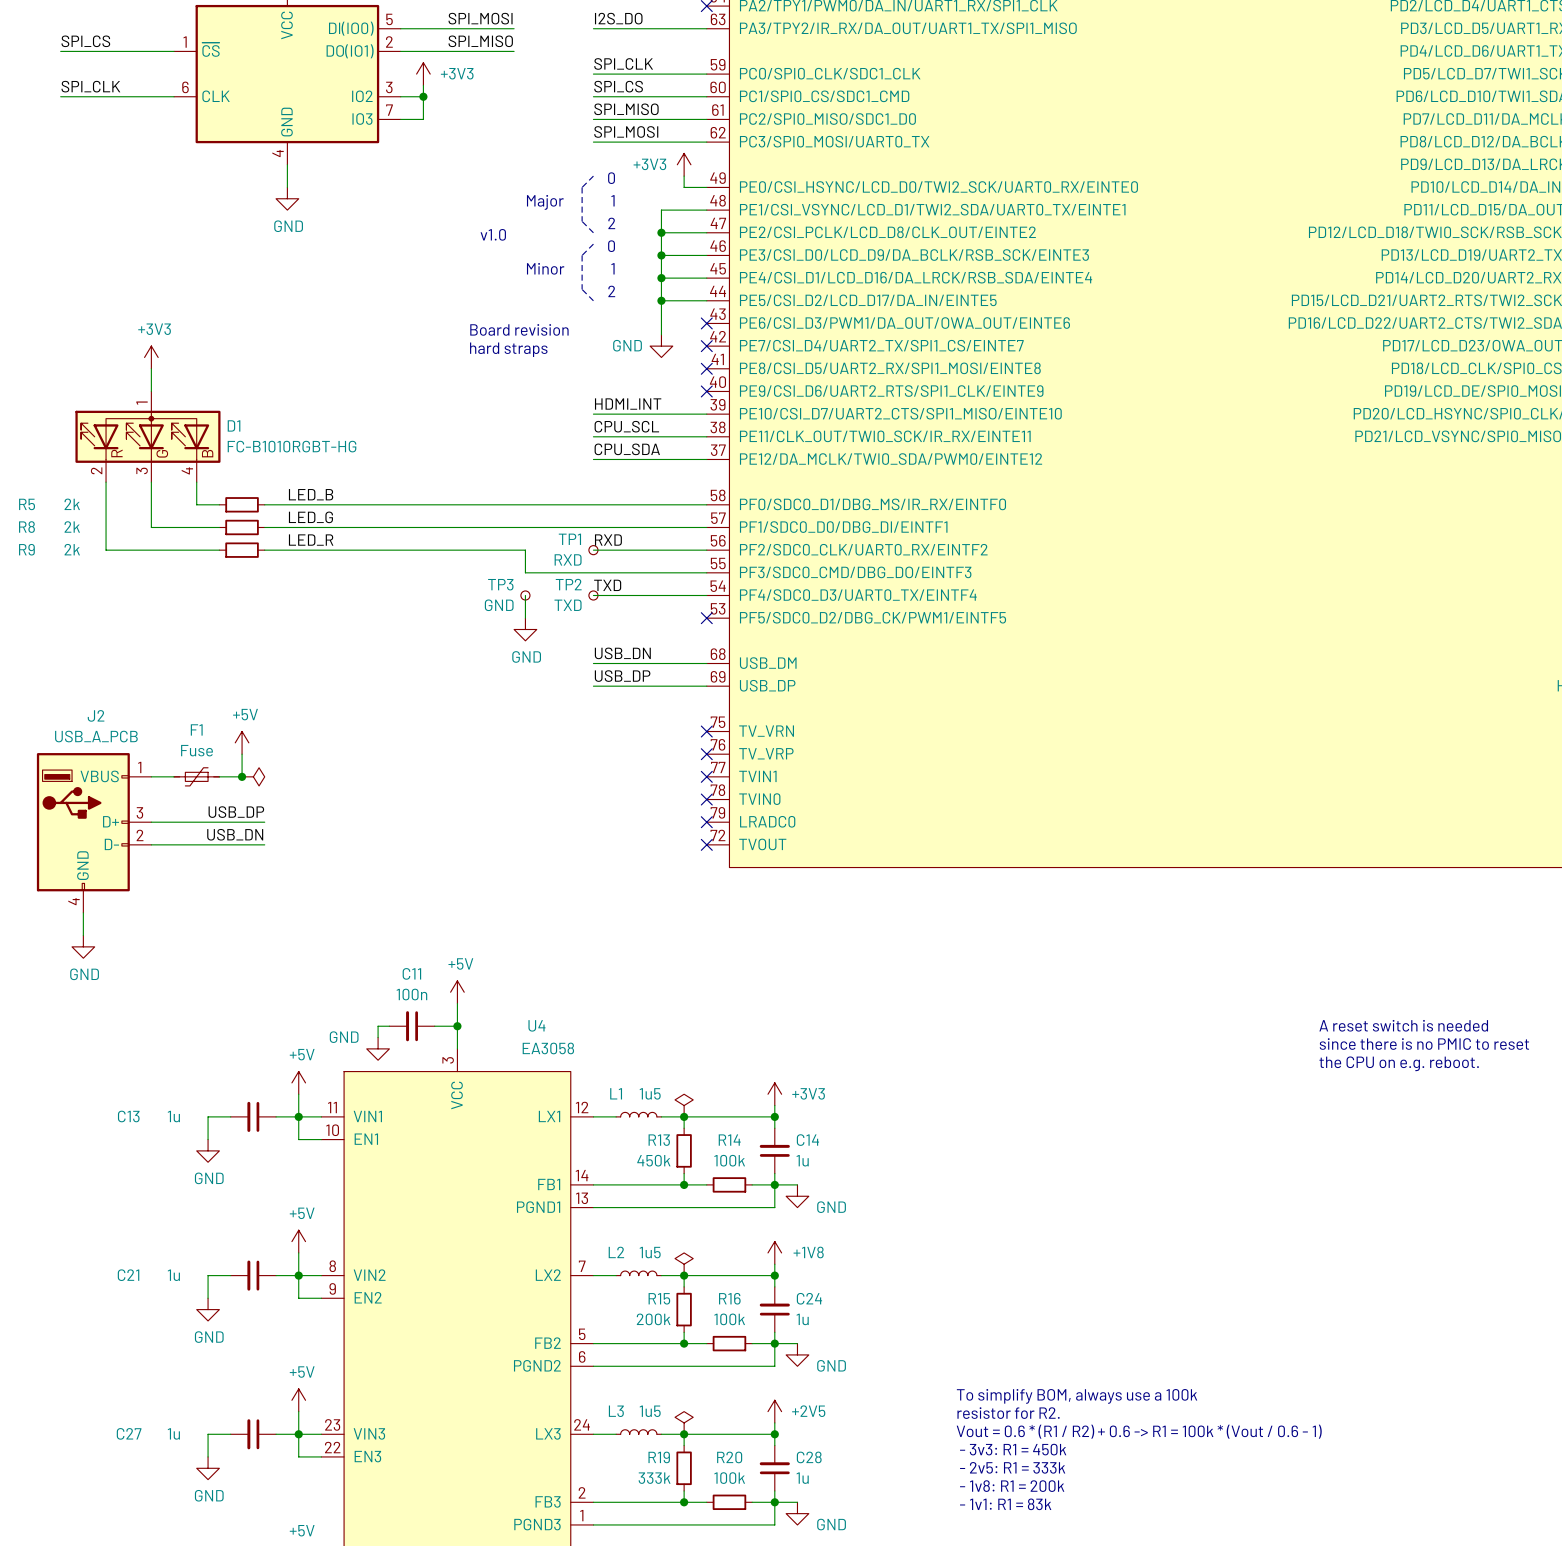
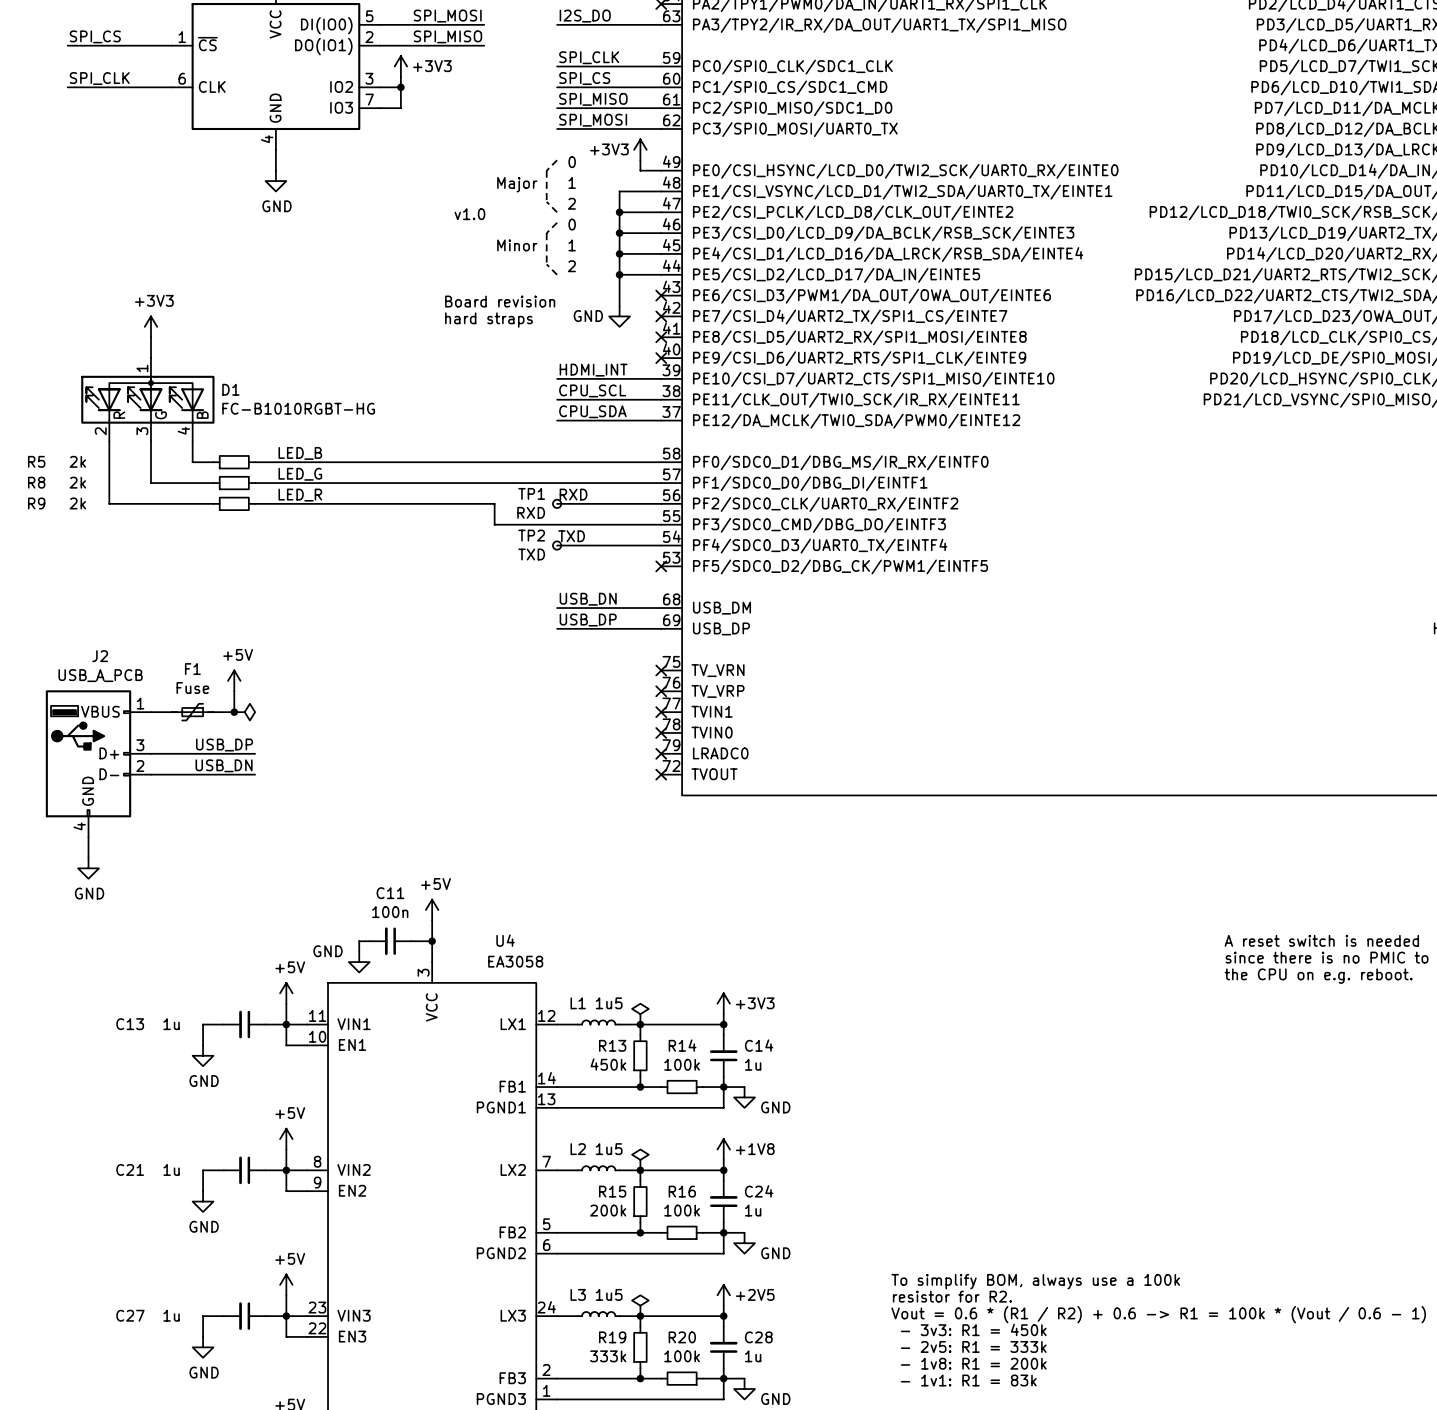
wire: (525, 595) (525, 618) -> none
TP3: GND (525, 595) -> none
power symbol: GND (525, 629) -> none

